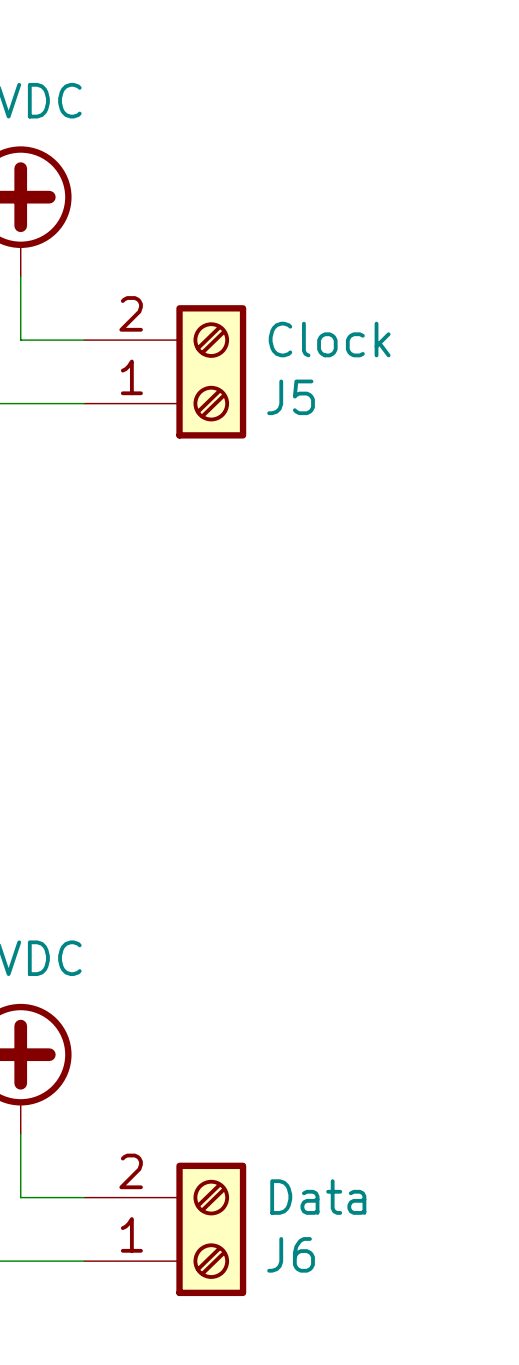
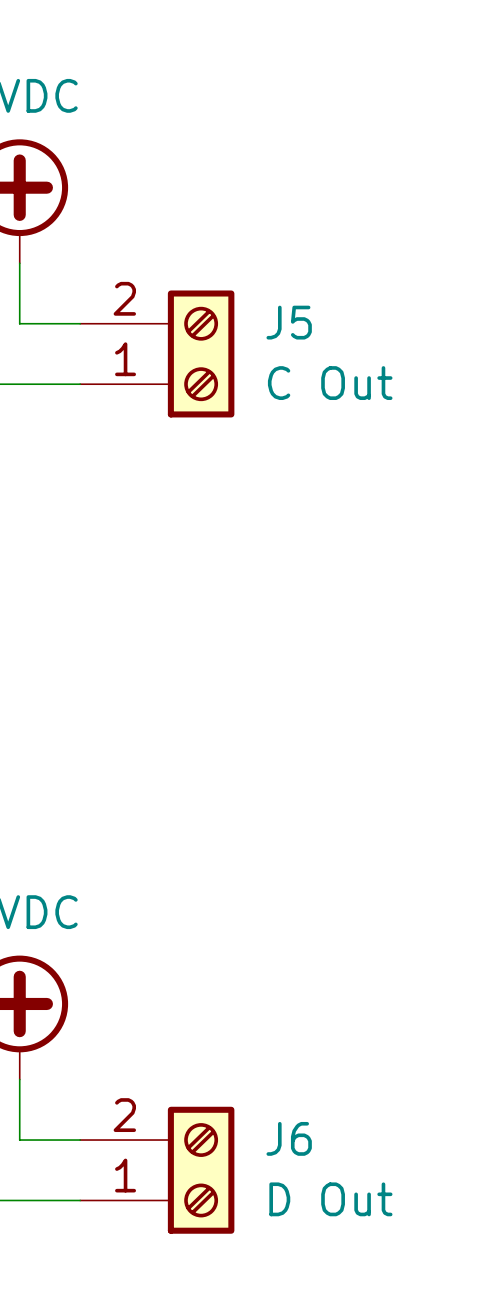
J5 value: Clock (329, 339) -> C Out (330, 383)
J5 name position: J5 (291, 397) -> J5 (289, 322)
J6 value: Data (318, 1197) -> D Out (330, 1199)
J6 name position: J6 (291, 1254) -> J6 (289, 1138)

